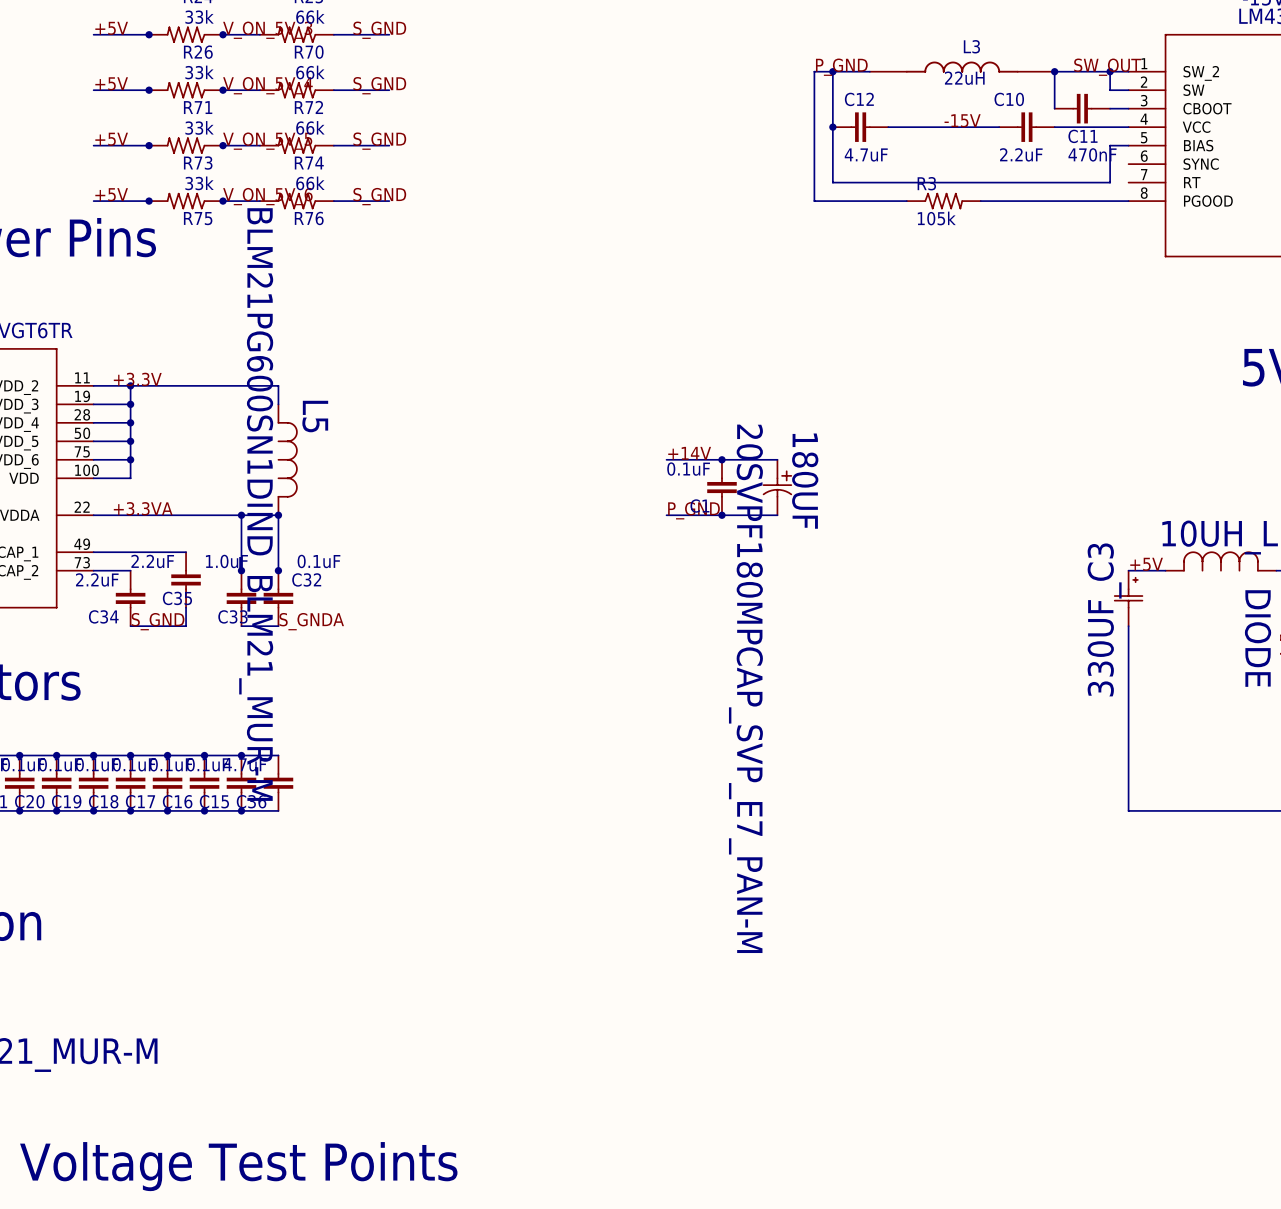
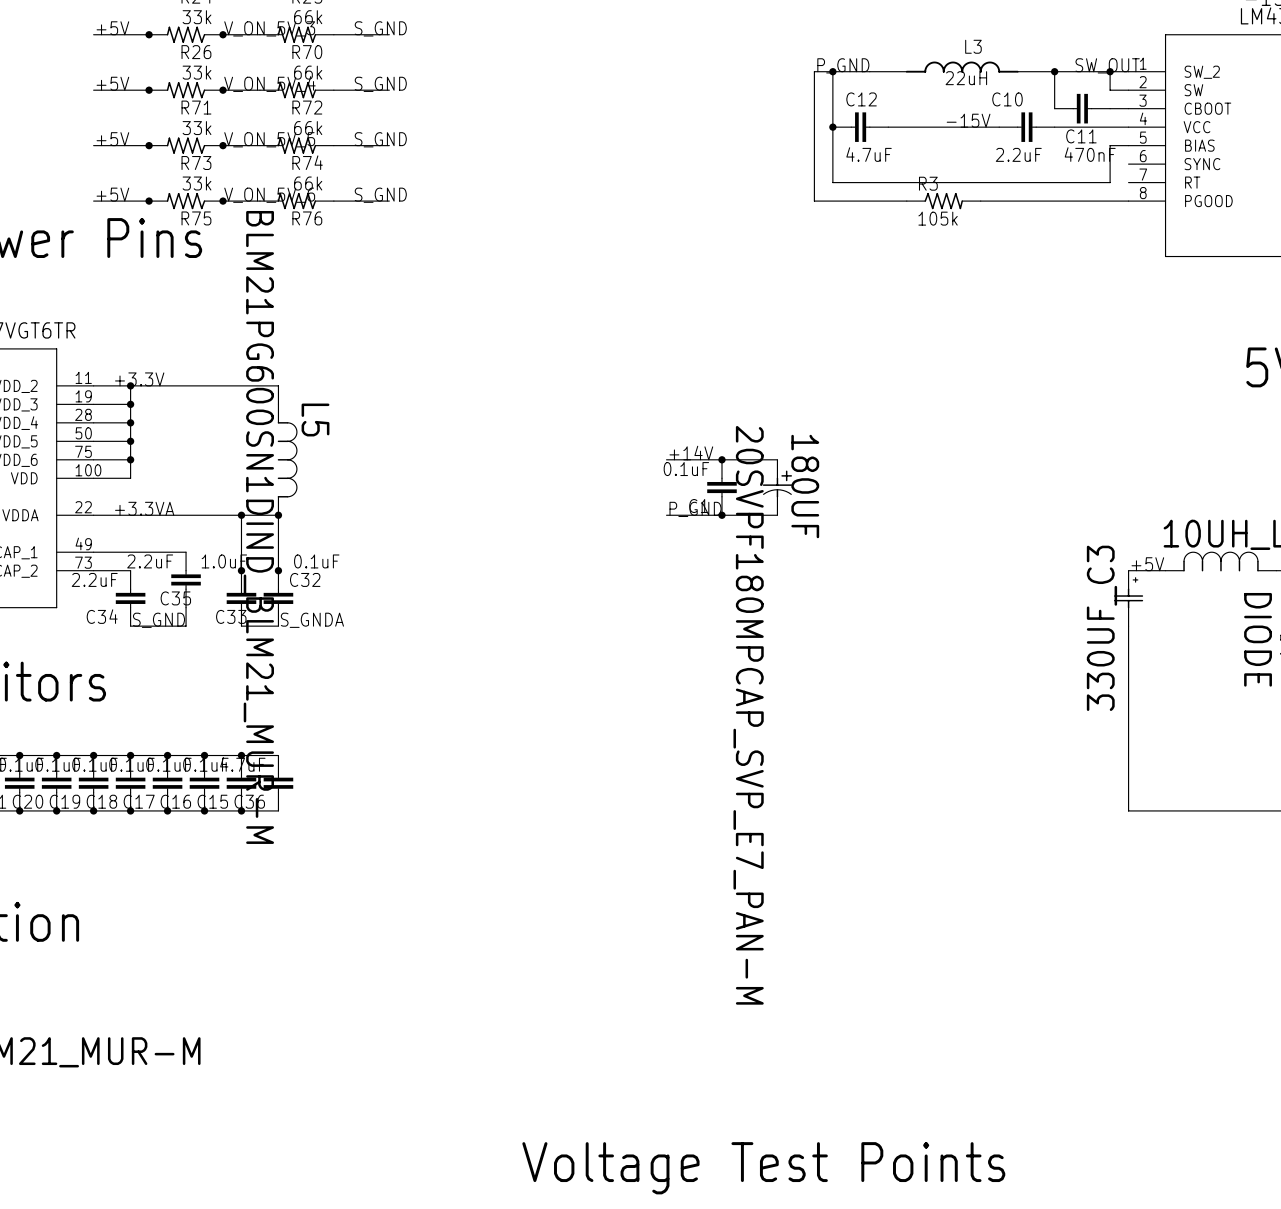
text: Voltage Test Points (238, 1166) -> none
text: none -> Voltage Test Points (763, 1168)

